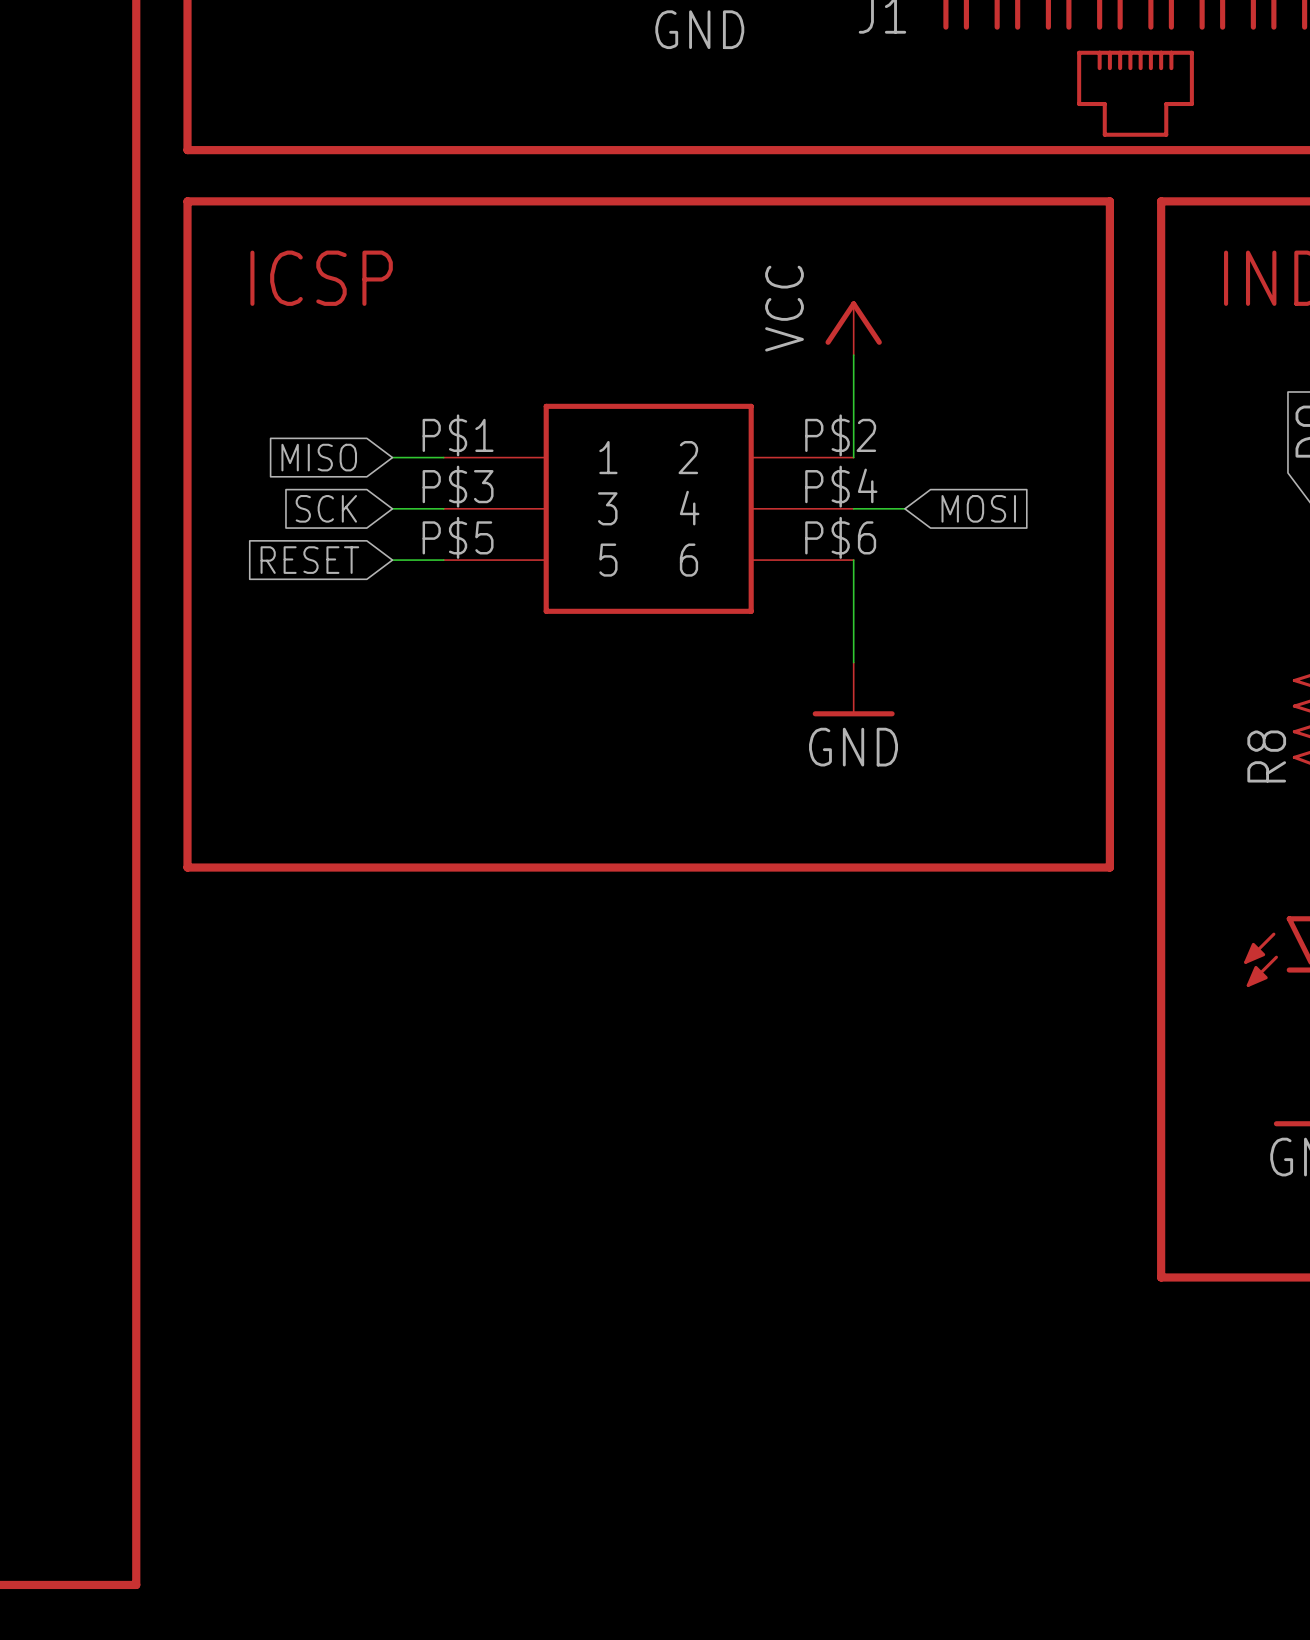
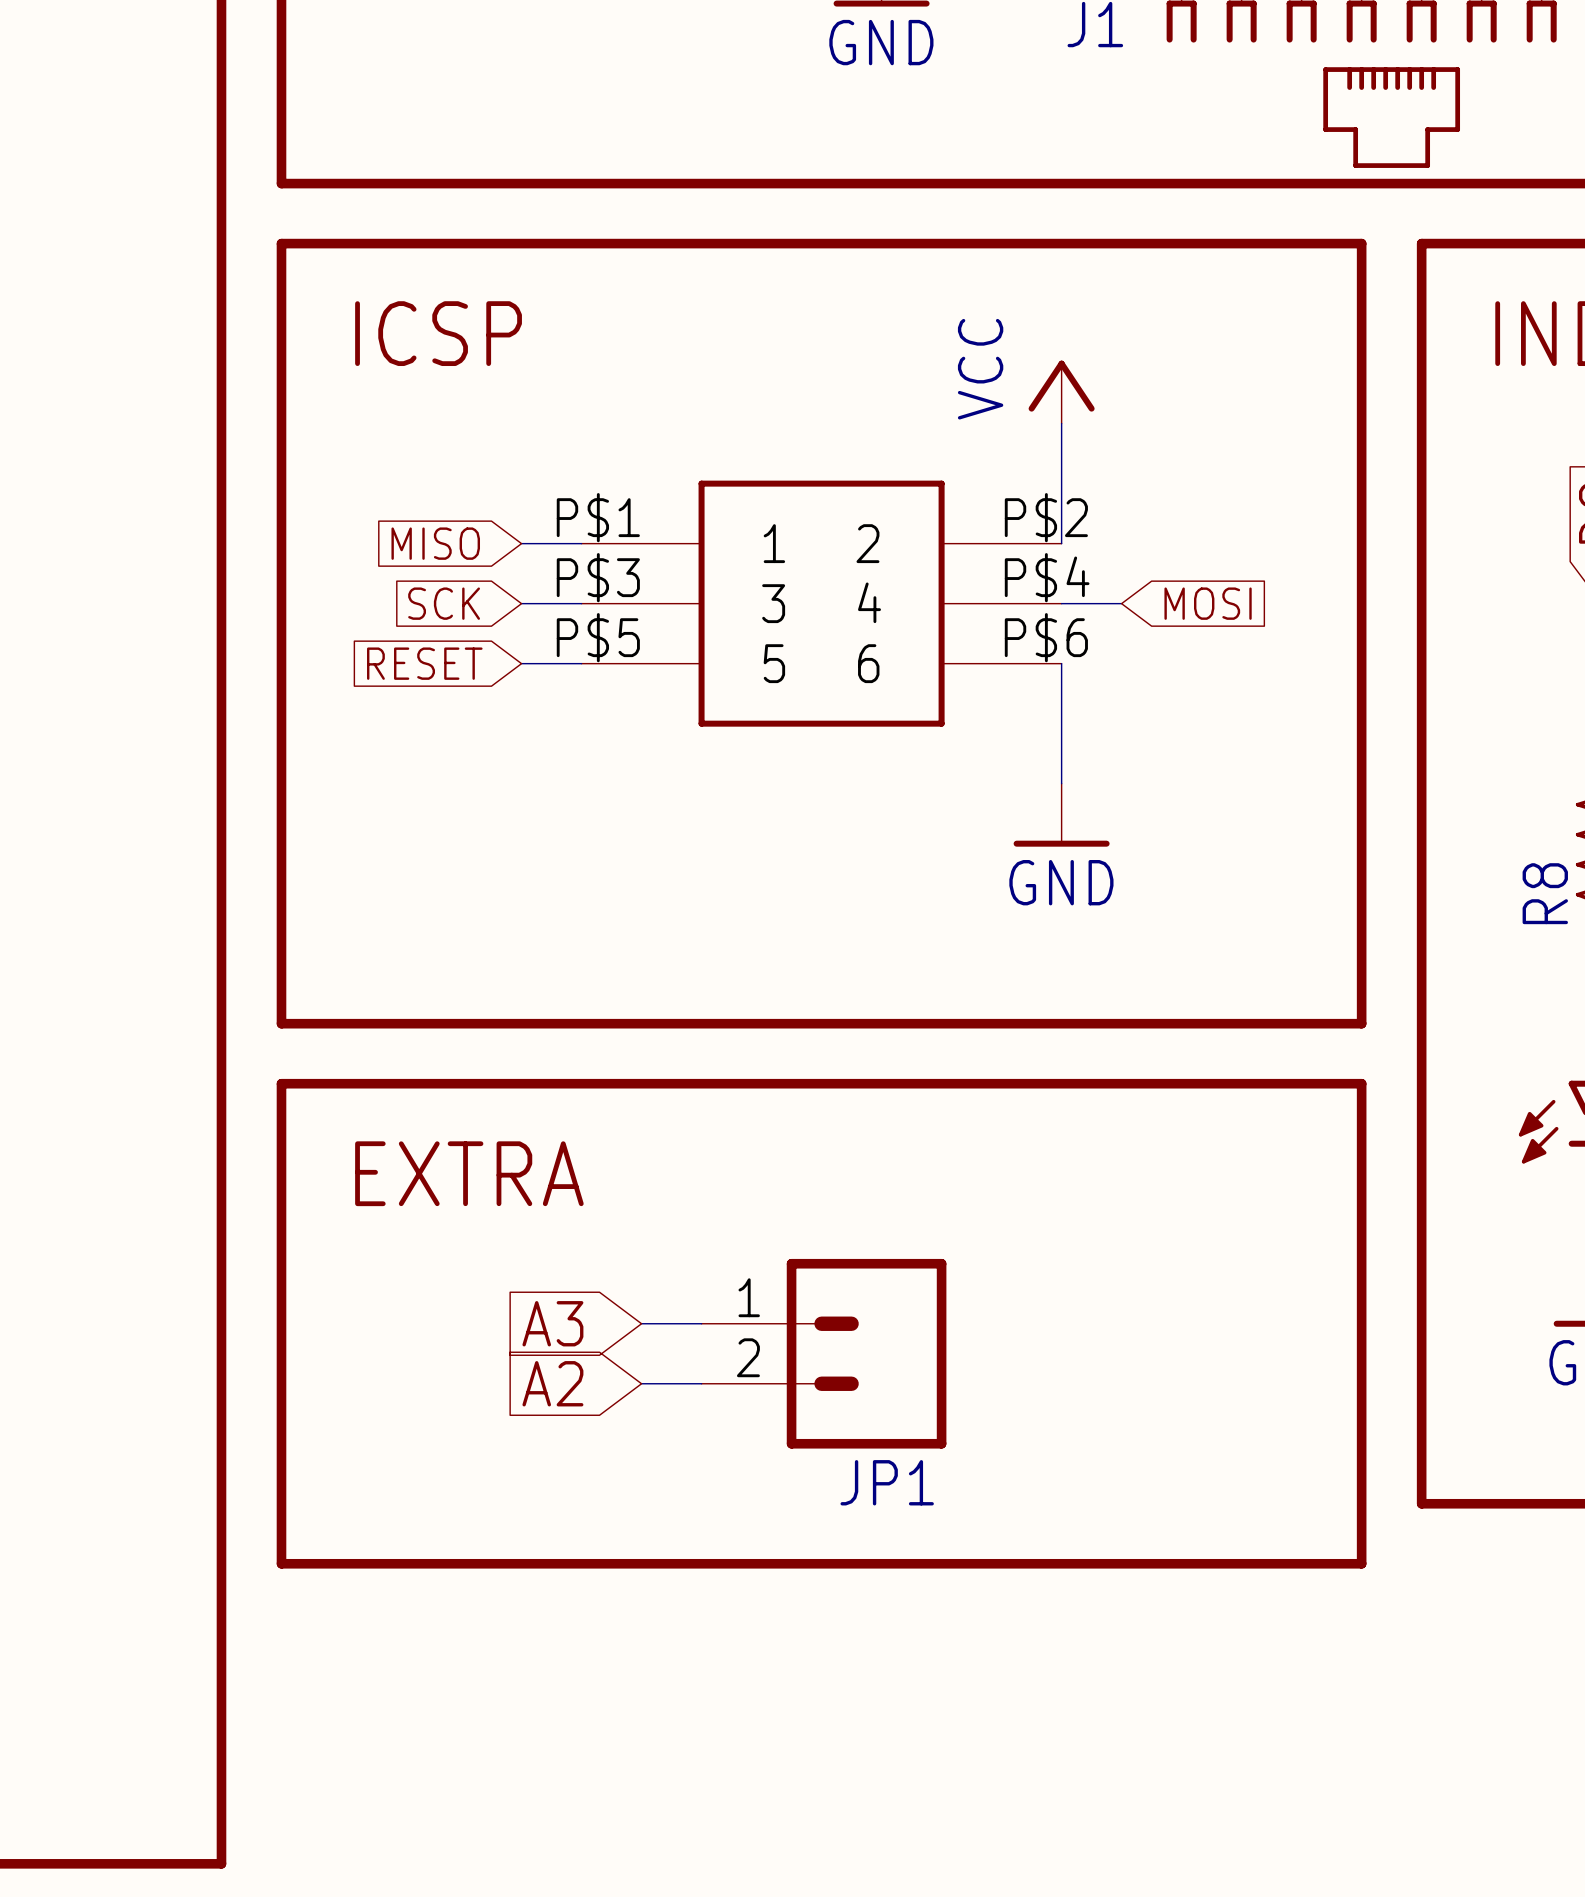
line: none -> (281, 1083) (1361, 1083) (1361, 1563) (281, 1563) (281, 1083)
text: none -> EXTRA (469, 1173)
global label: none -> A3 (552, 1323)
wire: none -> (641, 1323) (701, 1323)
JP1: none -> (823, 1353)
global label: none -> A2 (552, 1383)
wire: none -> (641, 1383) (701, 1383)

